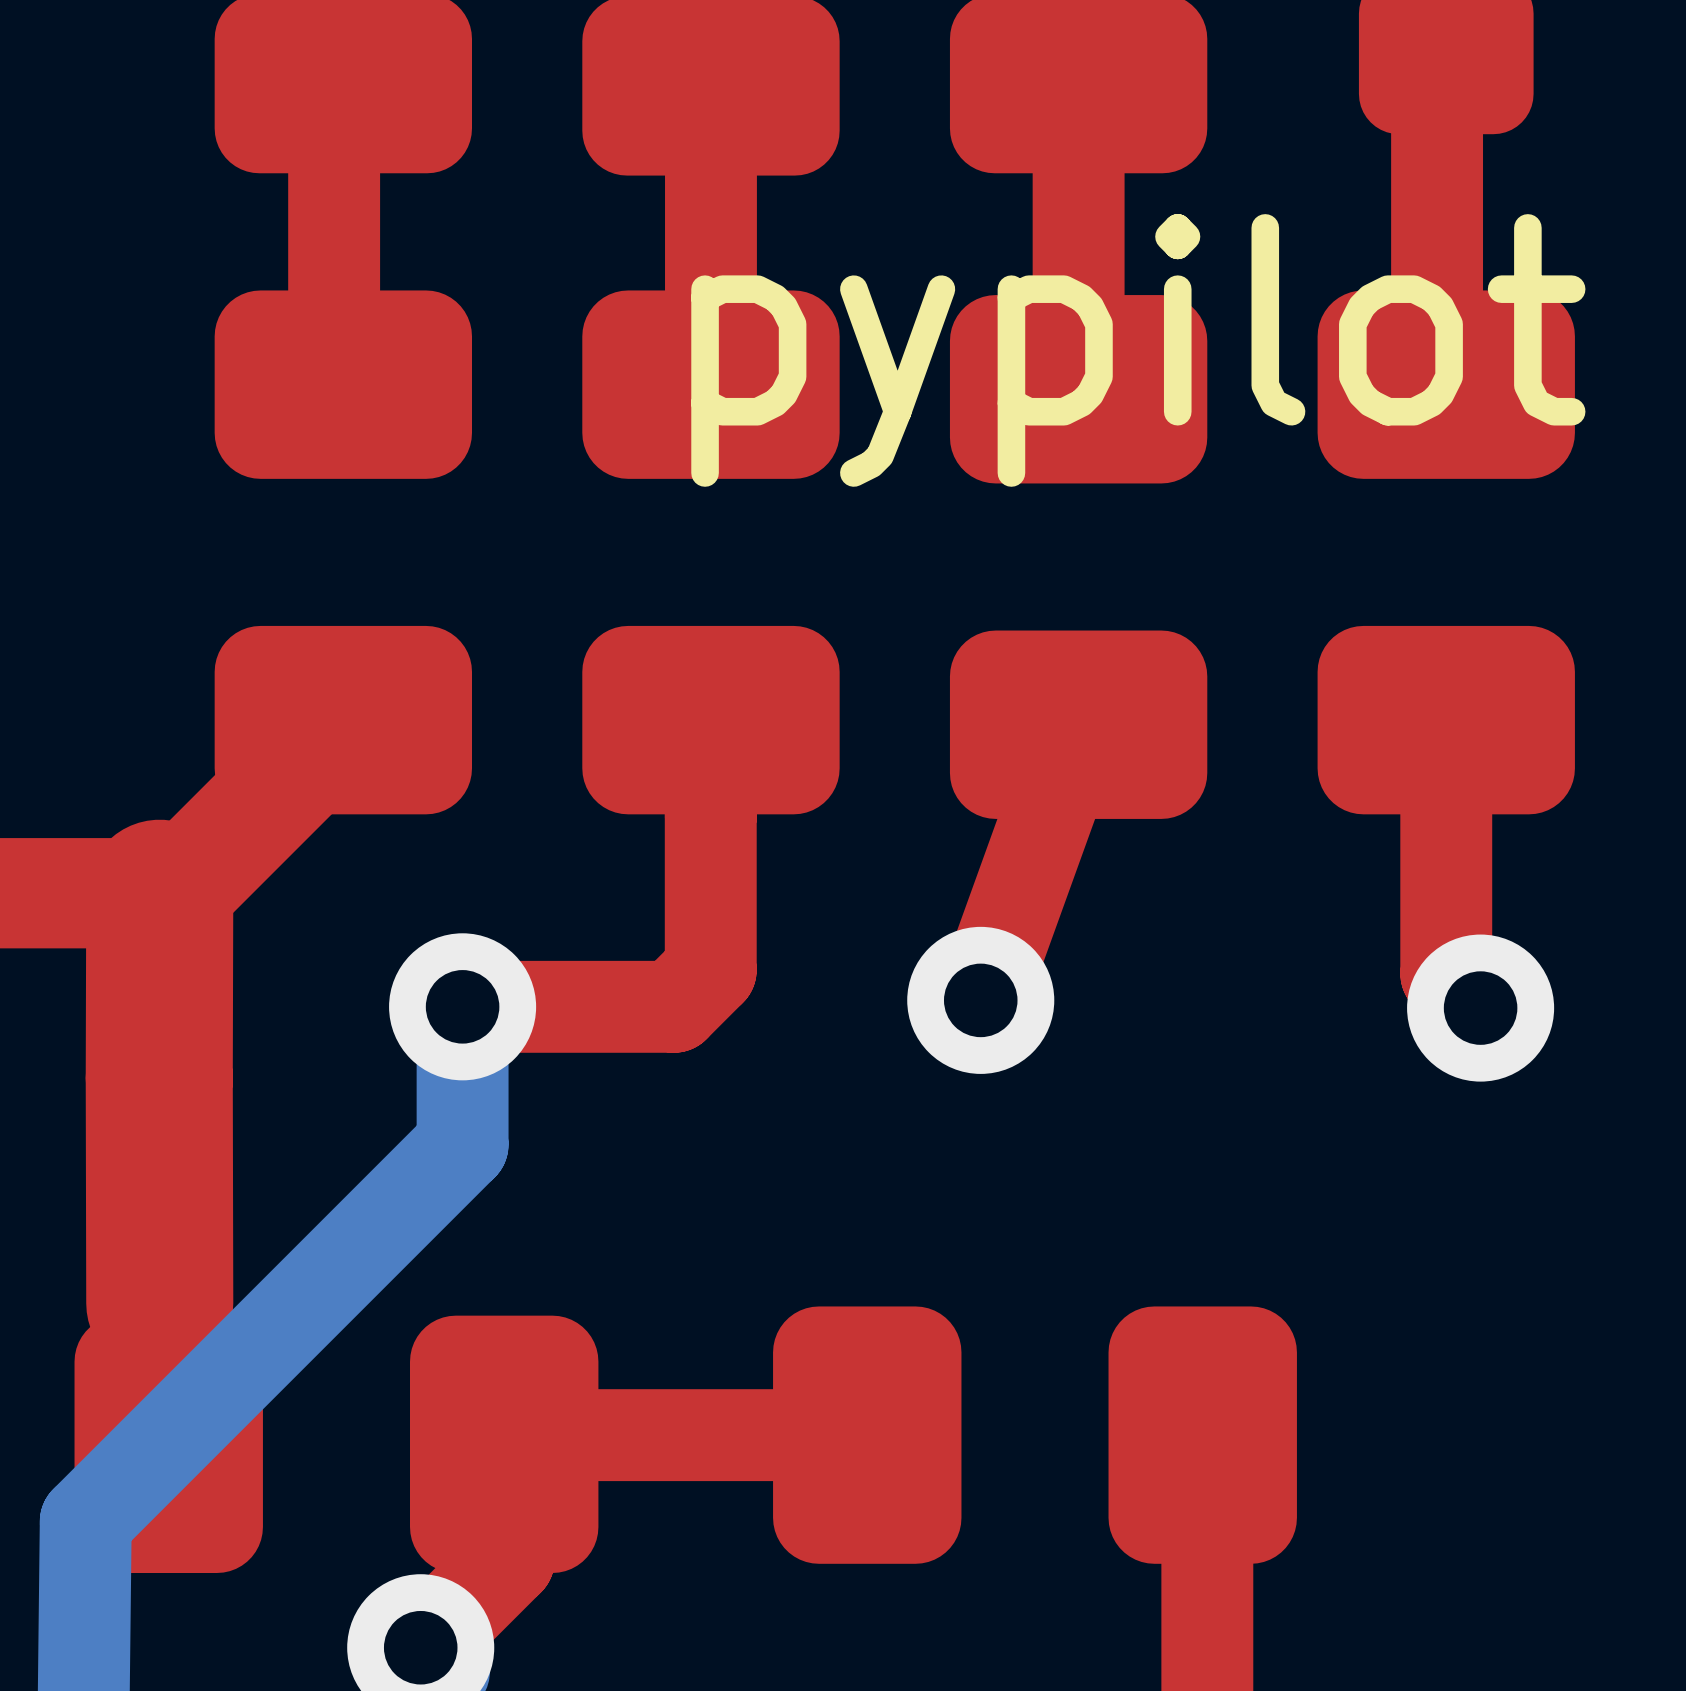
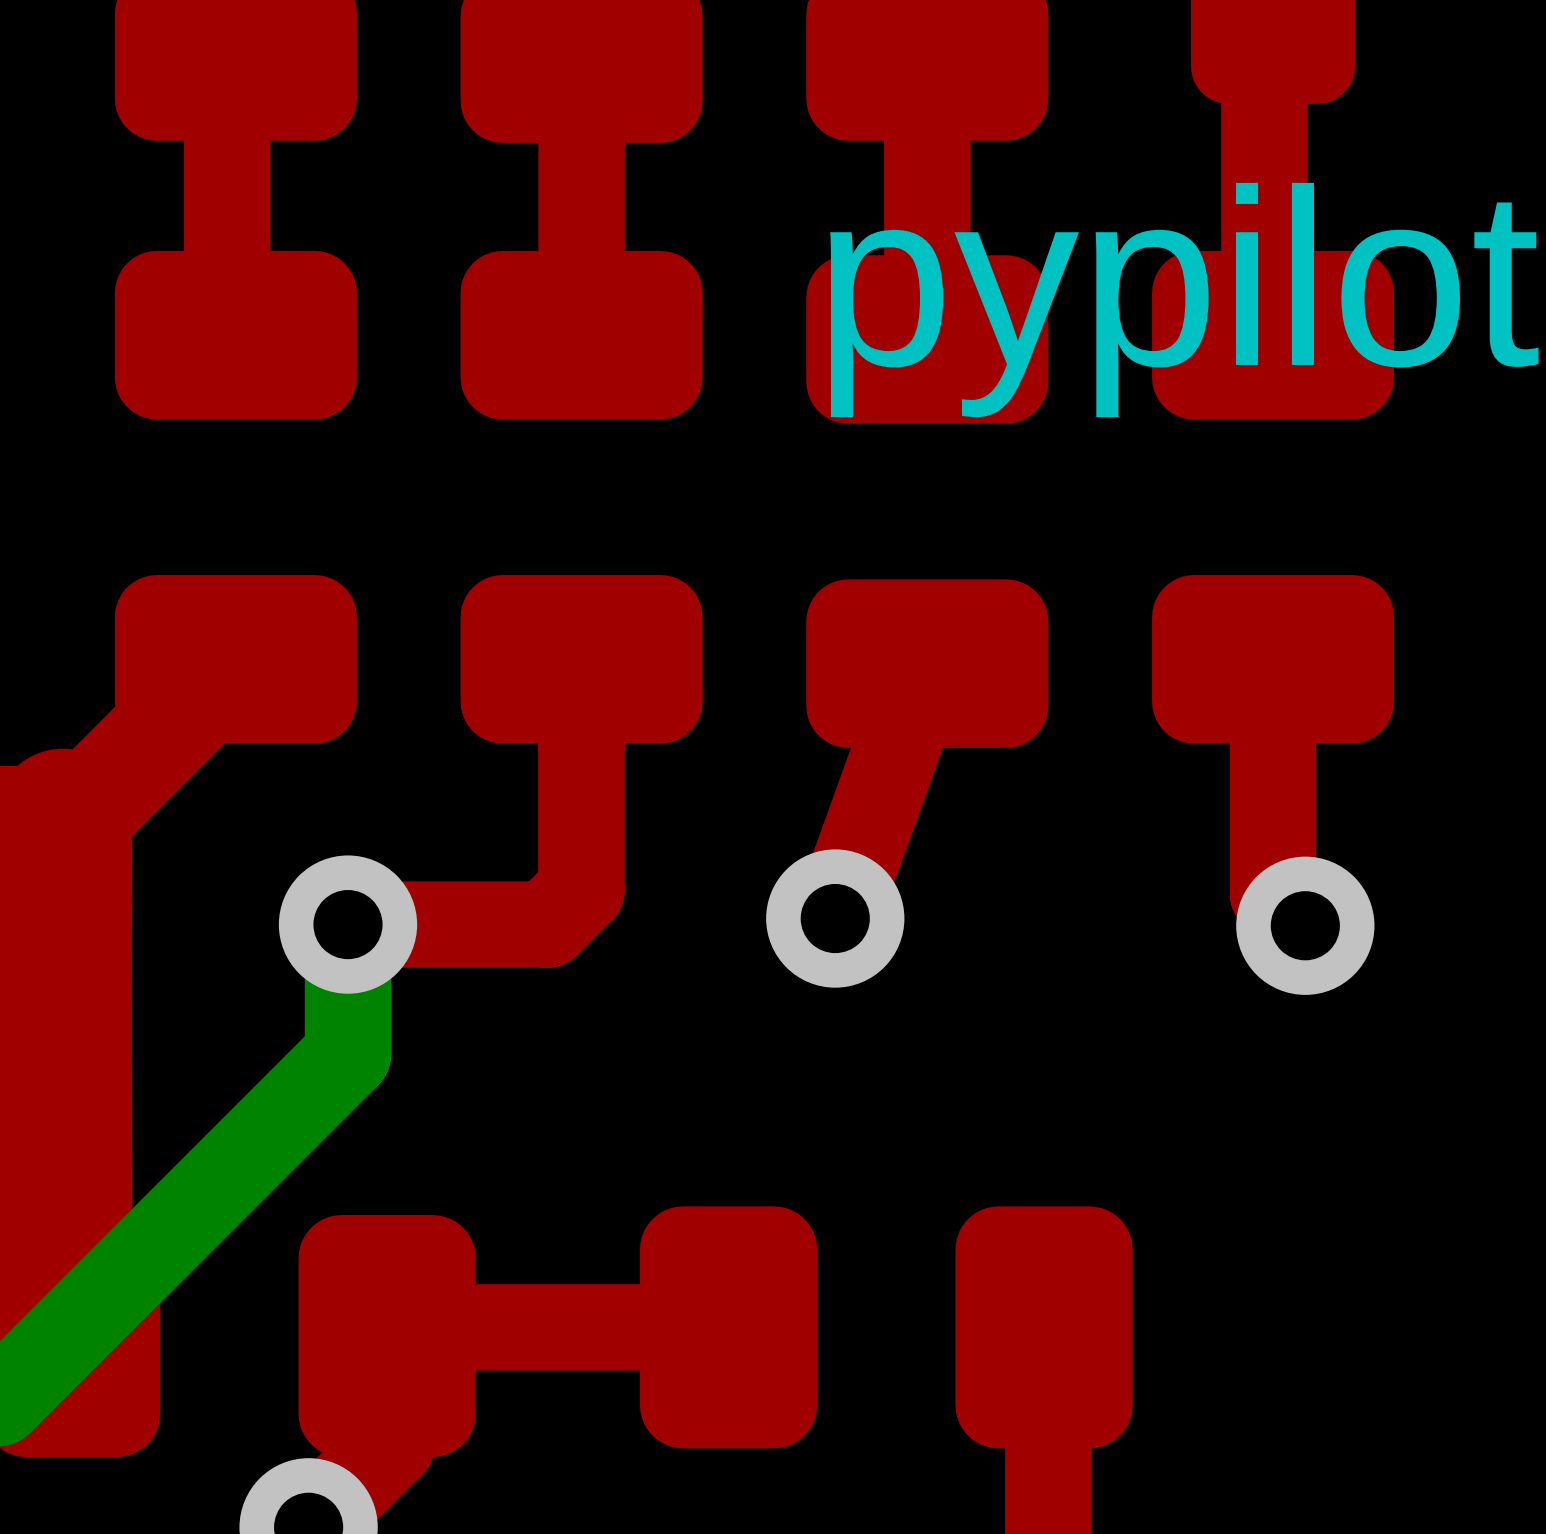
part footprint: [214, 290, 473, 815] -> [114, 250, 357, 744]
part footprint: [582, 290, 840, 815] -> [460, 250, 703, 744]
part footprint: [1317, 290, 1575, 815] -> [1152, 250, 1395, 744]
part footprint: [949, 295, 1208, 819] -> [806, 255, 1049, 748]

